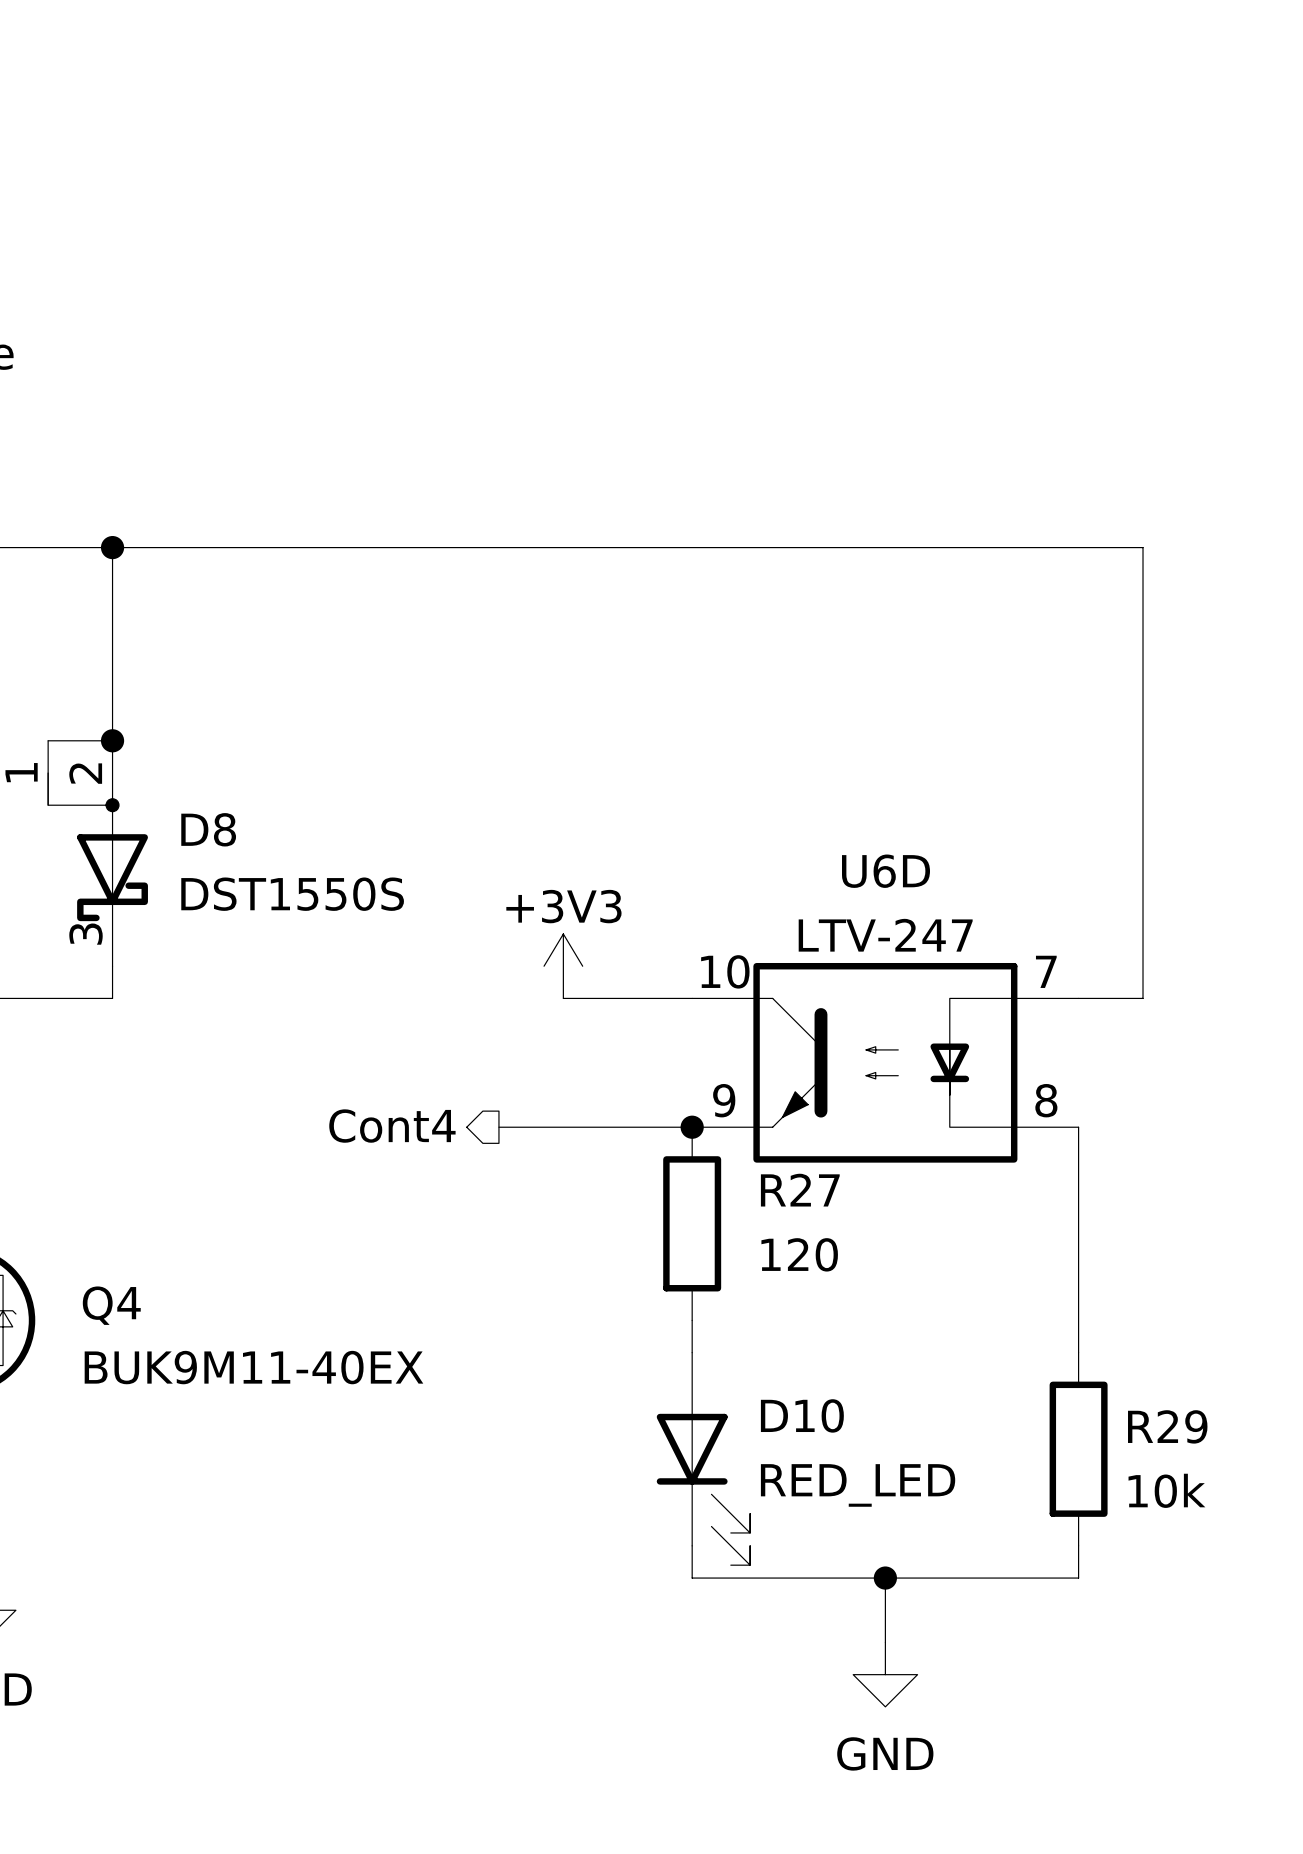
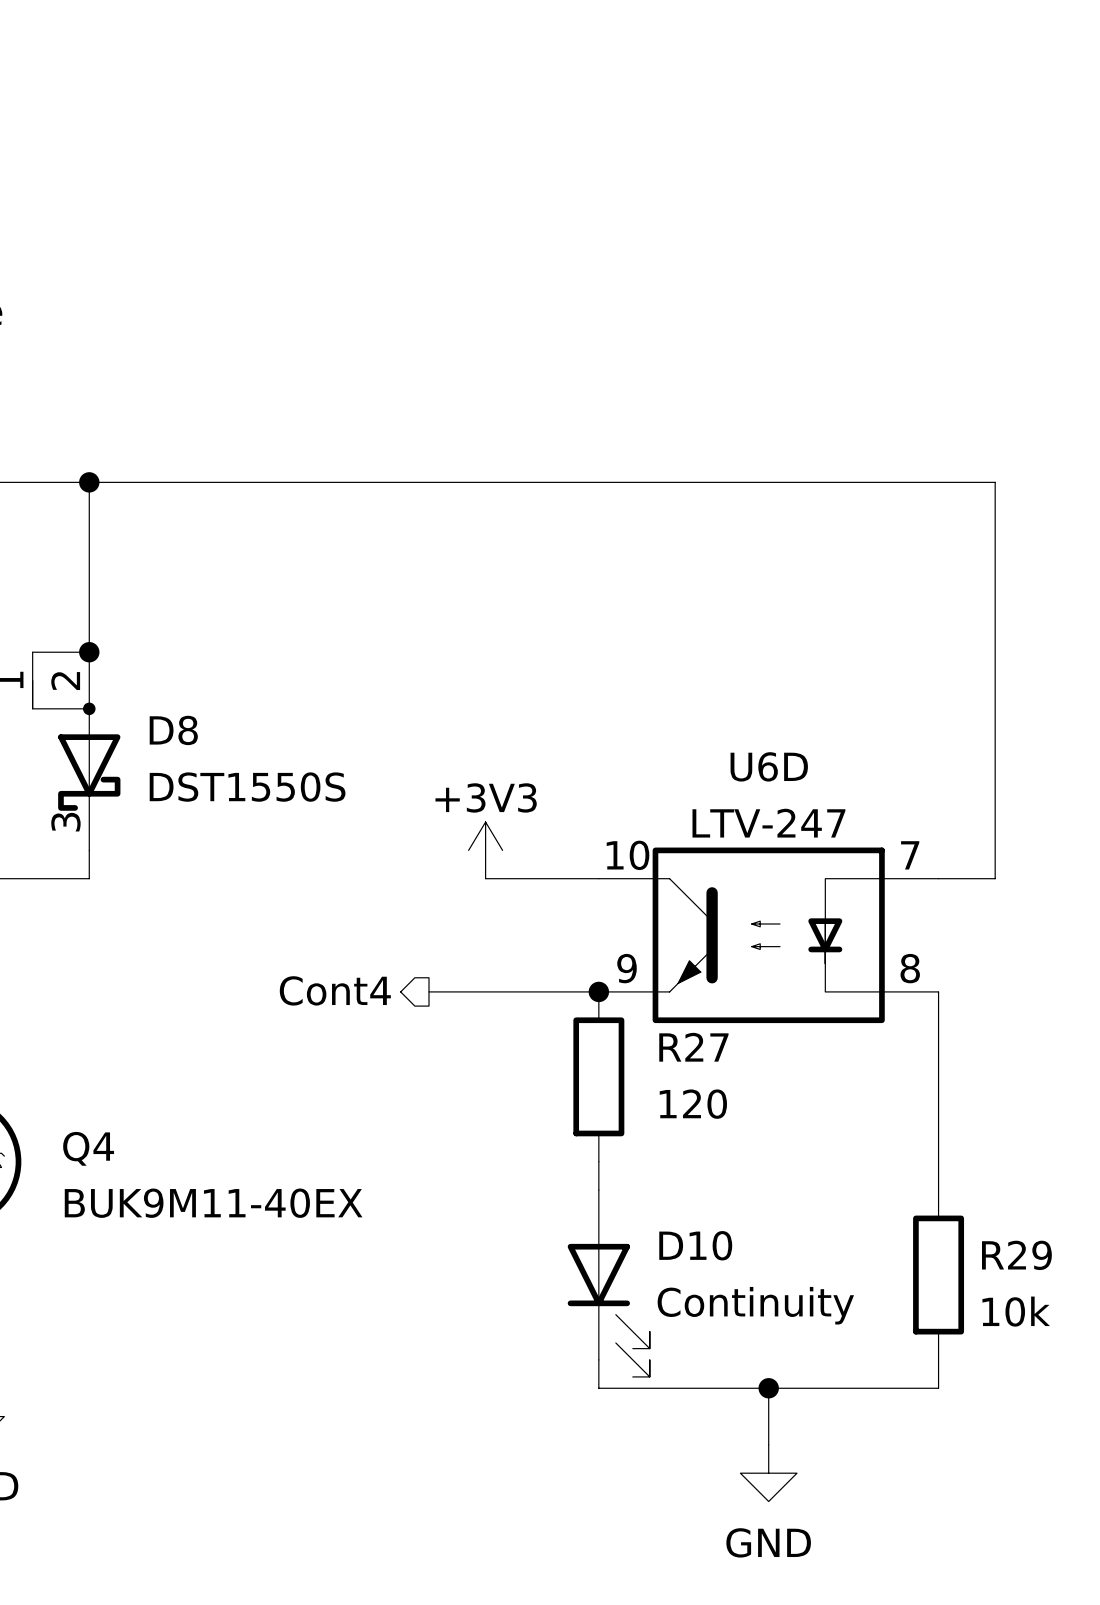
D10 value: RED_LED (858, 1485) -> Continuity (755, 1305)

